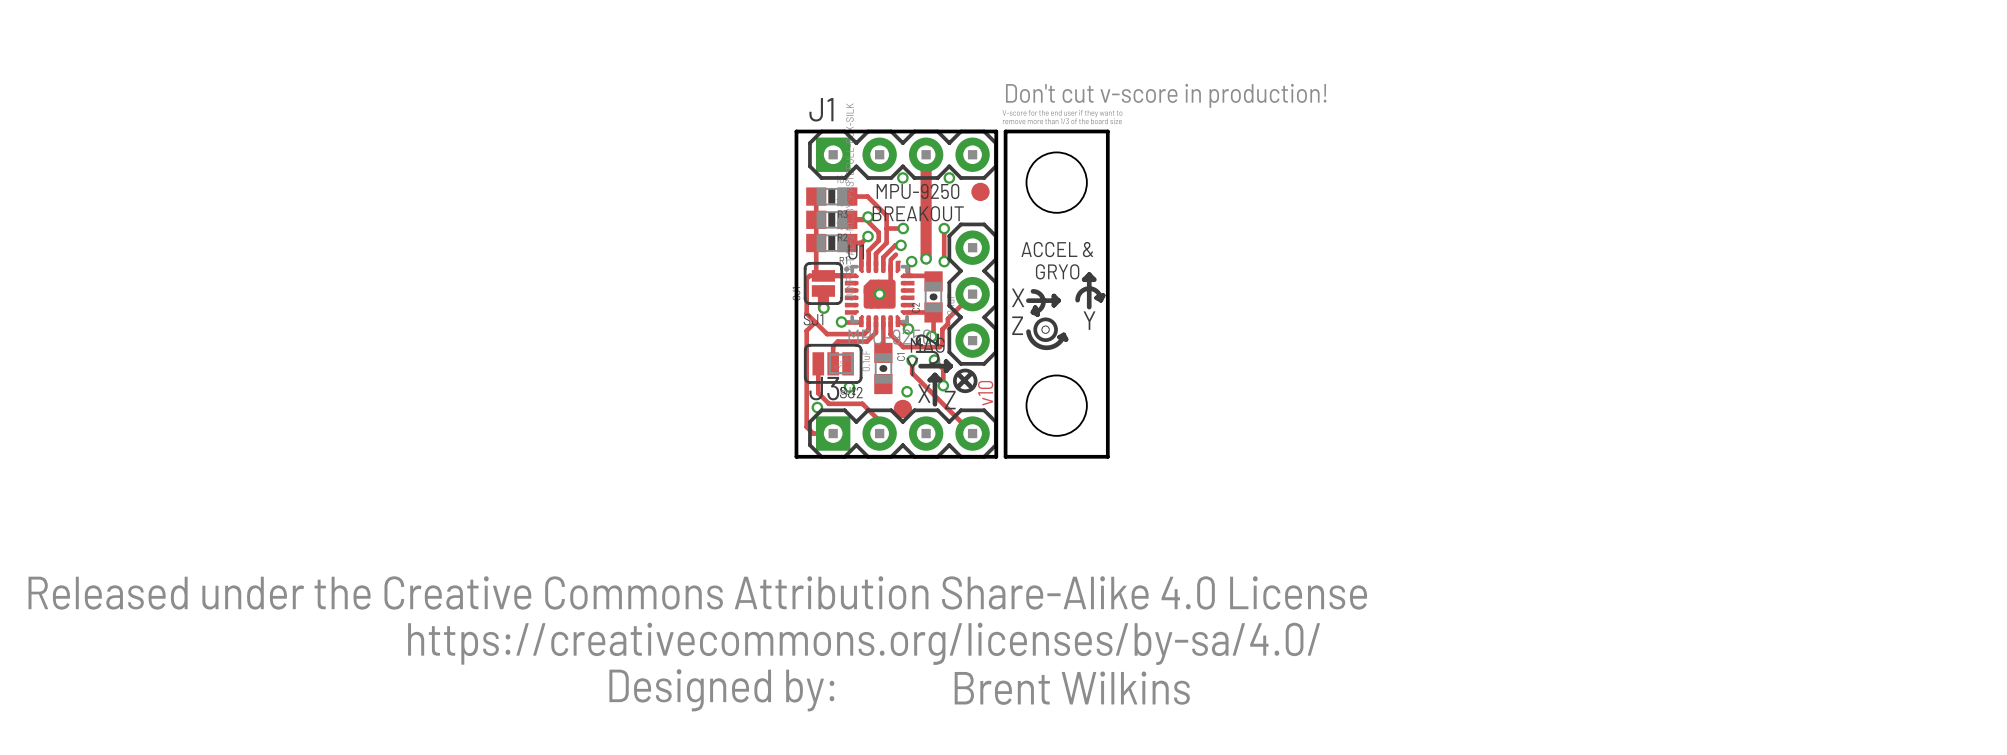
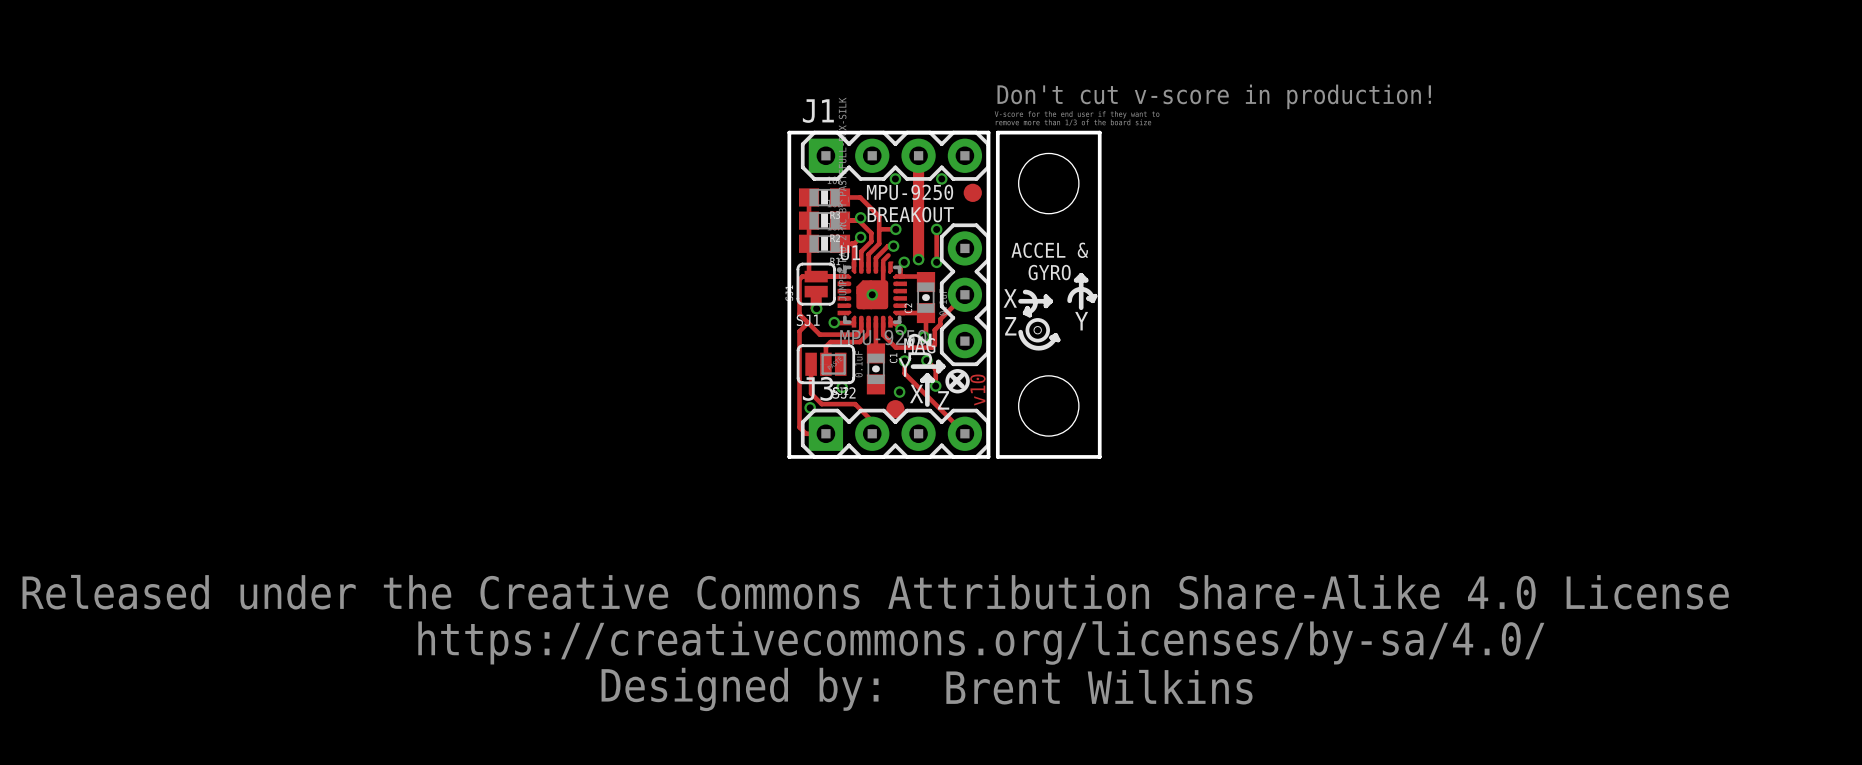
text: GRYO (1057, 271) -> GYRO (1049, 272)

